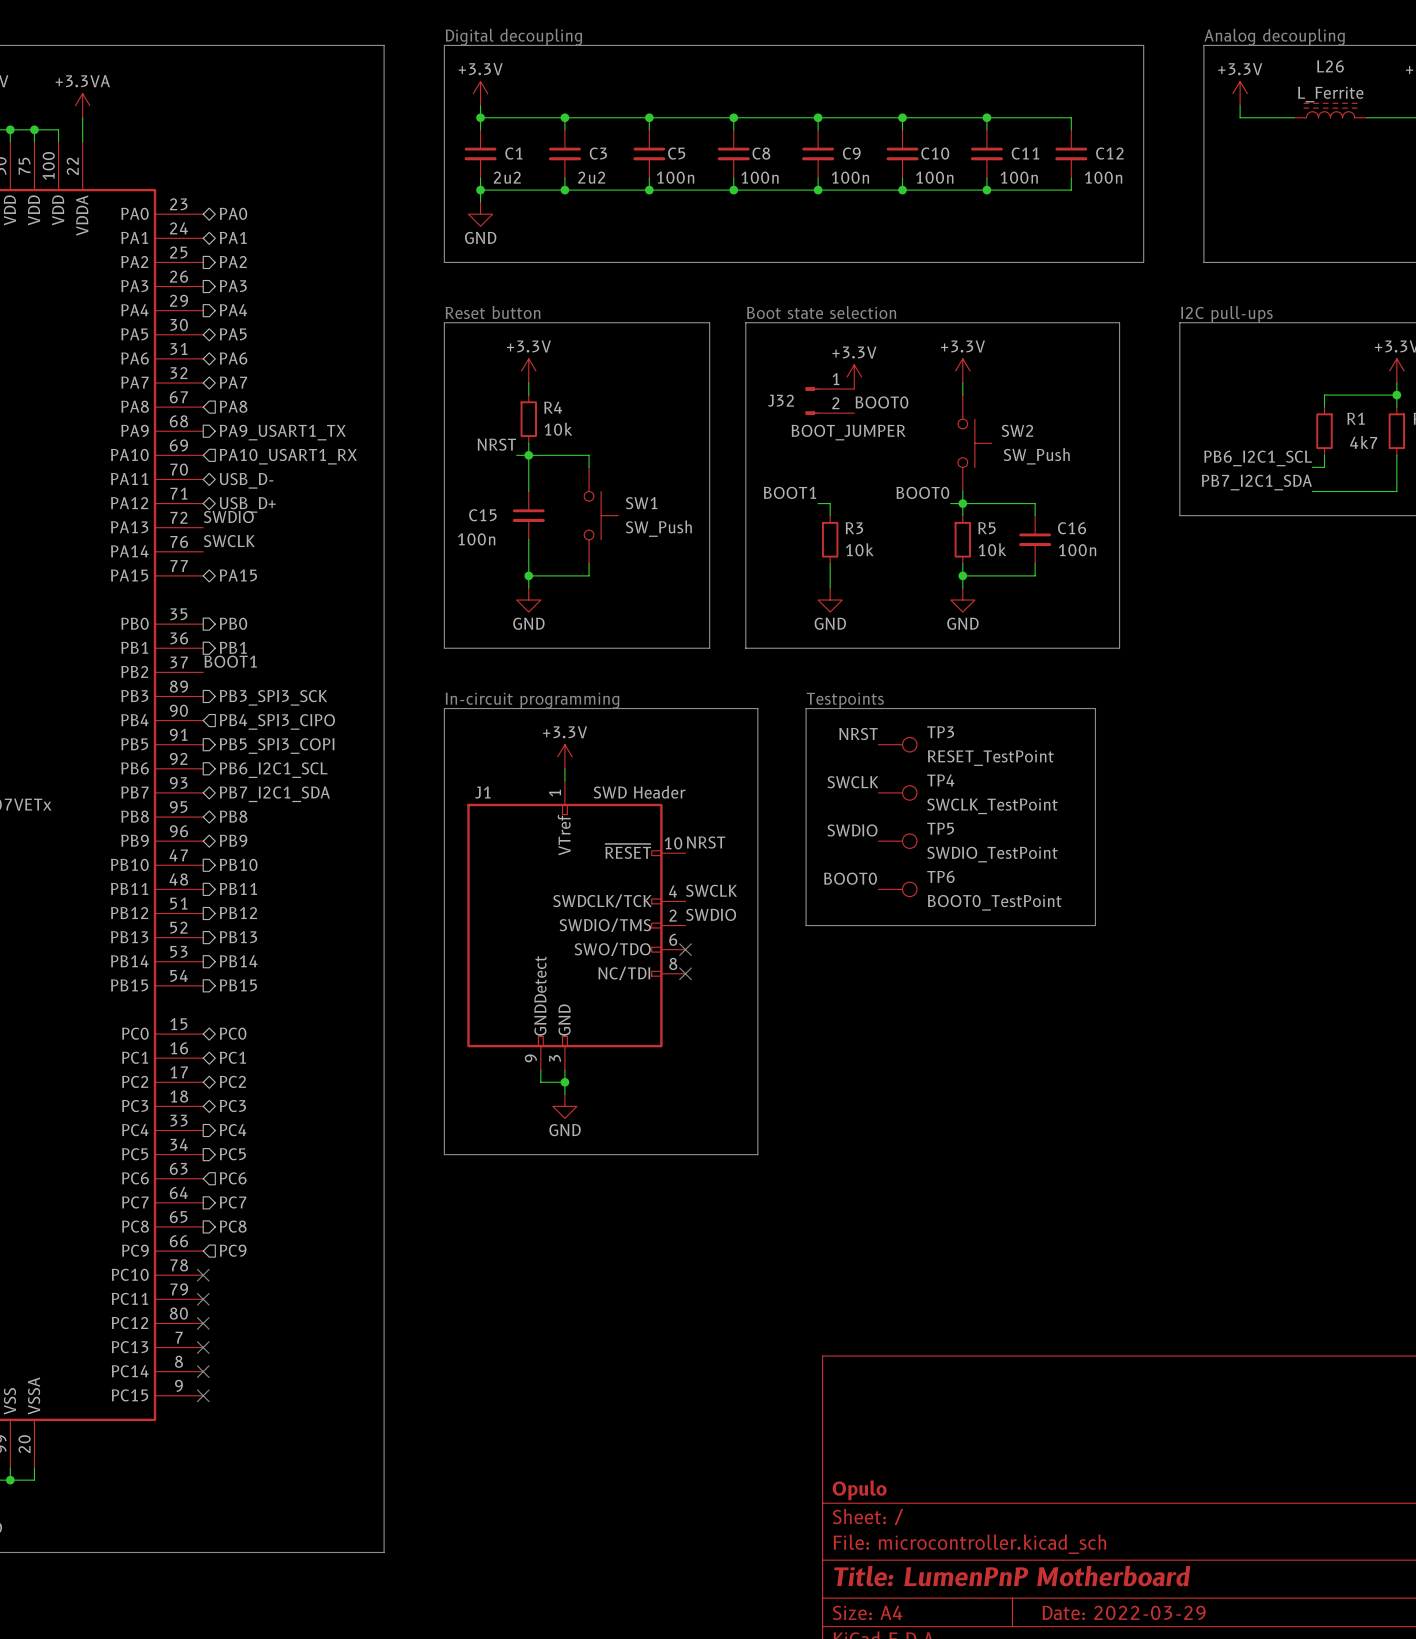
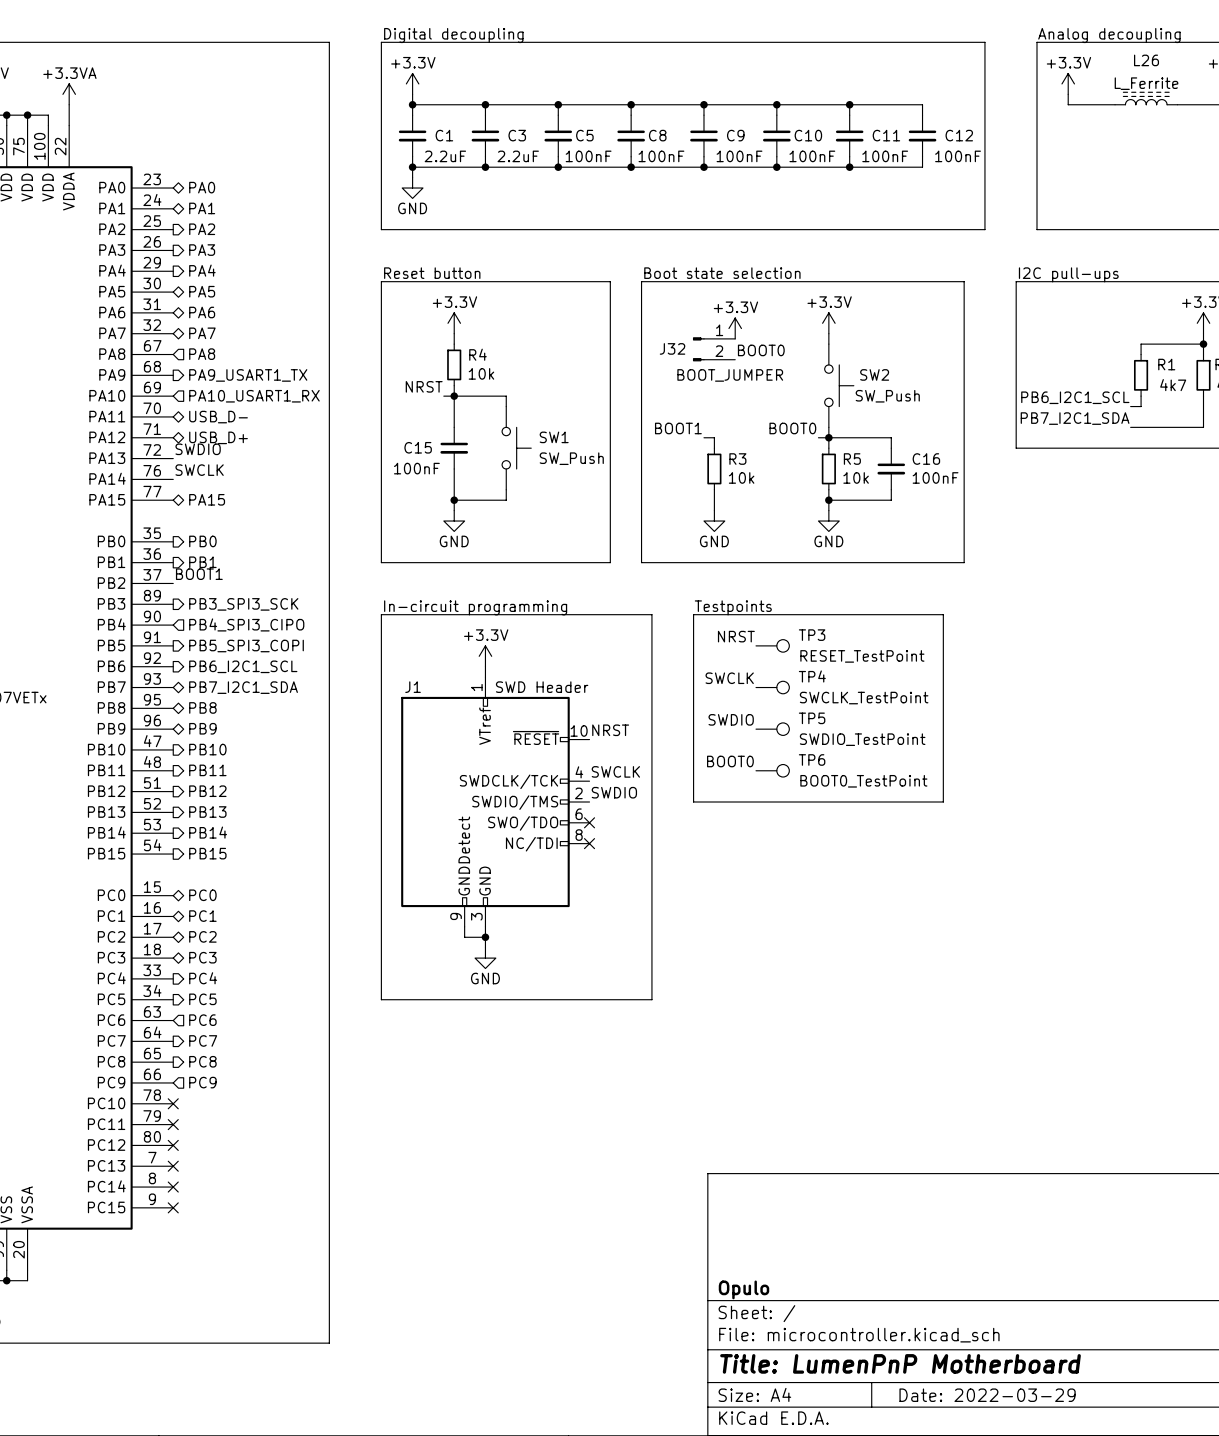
C1 value: 2u2 (507, 177) -> 2.2uF (445, 156)
C3 value: 2u2 (591, 177) -> 2.2uF (518, 156)
C5 value: 100n (675, 177) -> 100nF (588, 156)
C8 value: 100n (759, 177) -> 100nF (661, 156)
C9 value: 100n (850, 177) -> 100nF (739, 156)
C10 value: 100n (934, 177) -> 100nF (812, 156)
C11 value: 100n (1019, 177) -> 100nF (885, 156)
C12 value: 100n (1103, 177) -> 100nF (958, 156)
C15 value: 100n (476, 539) -> 100nF (416, 468)
C16 value: 100n (1077, 550) -> 100nF (935, 477)

